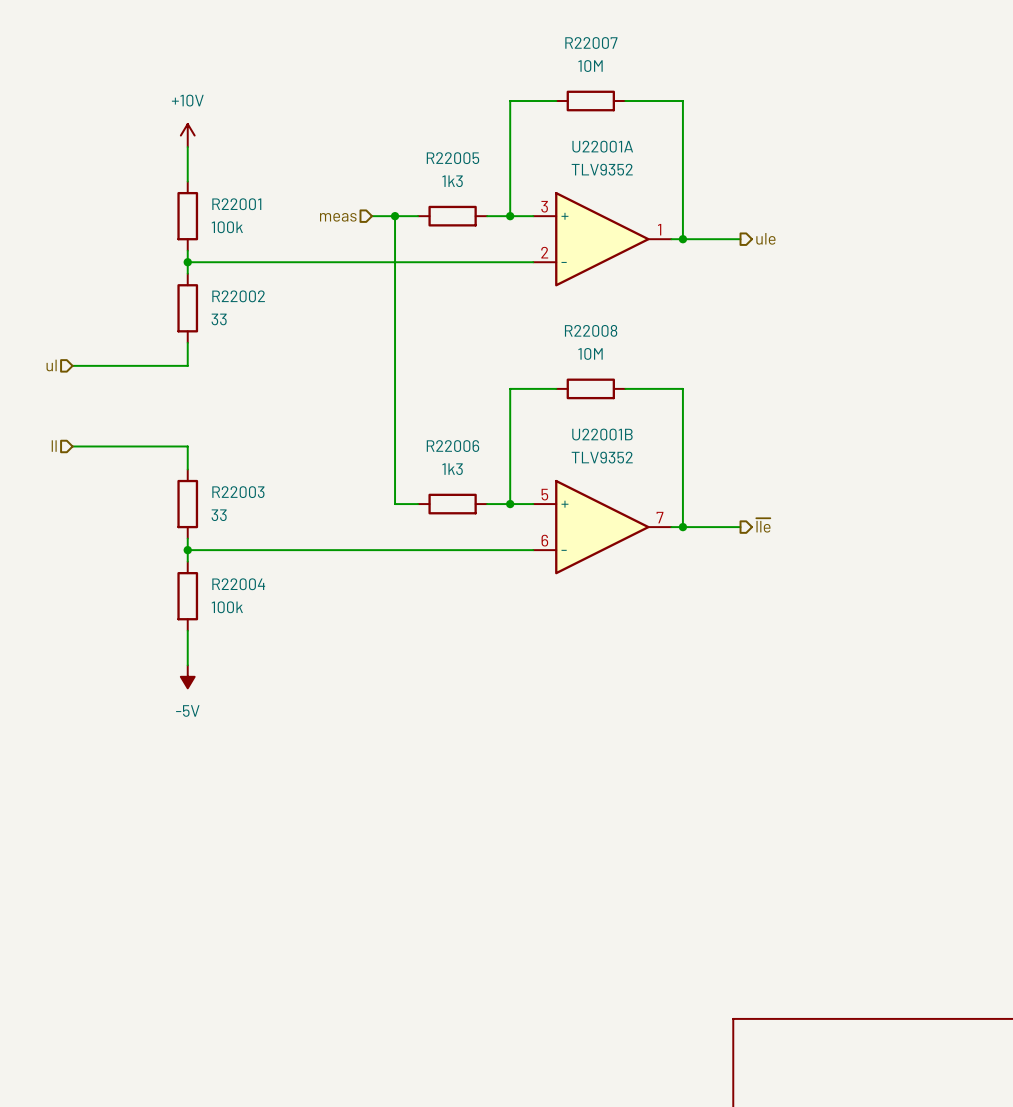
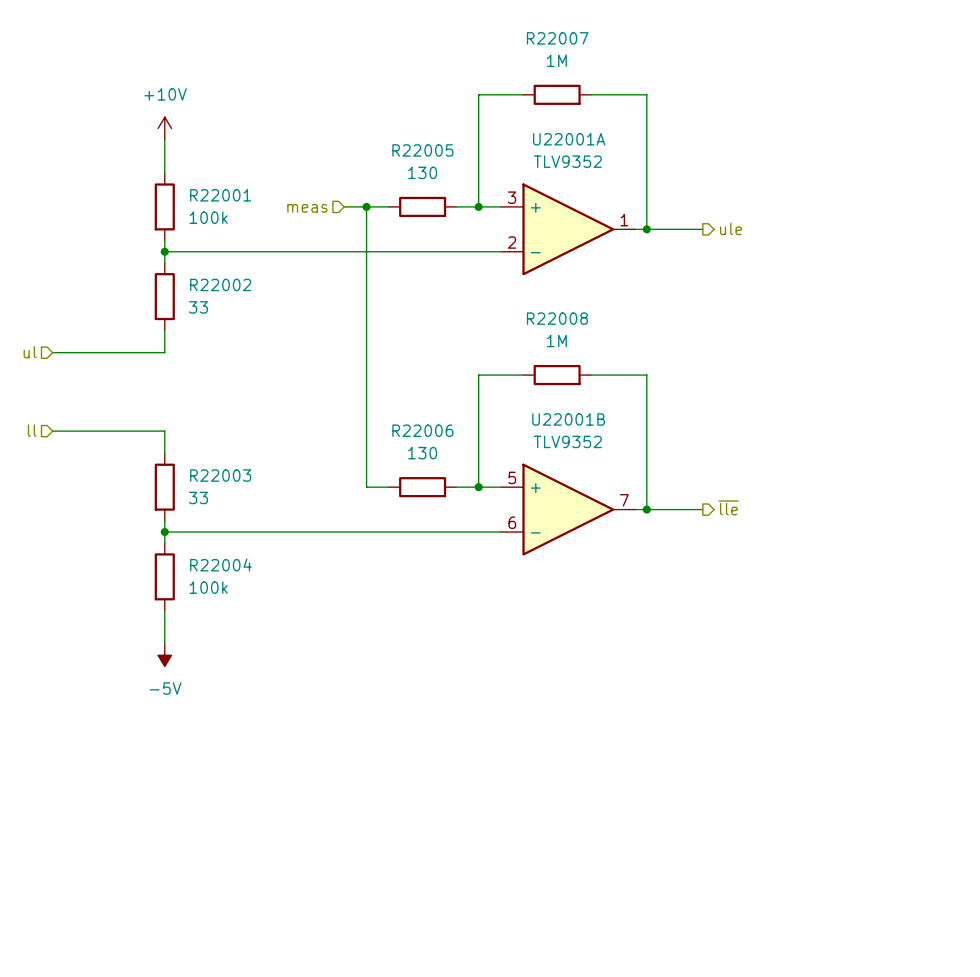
R22007 value: 10M (590, 66) -> 1M (556, 60)
R22005 value: 1k3 (452, 181) -> 130 (422, 172)
R22008 value: 10M (590, 353) -> 1M (556, 341)
R22006 value: 1k3 (452, 469) -> 130 (422, 453)

